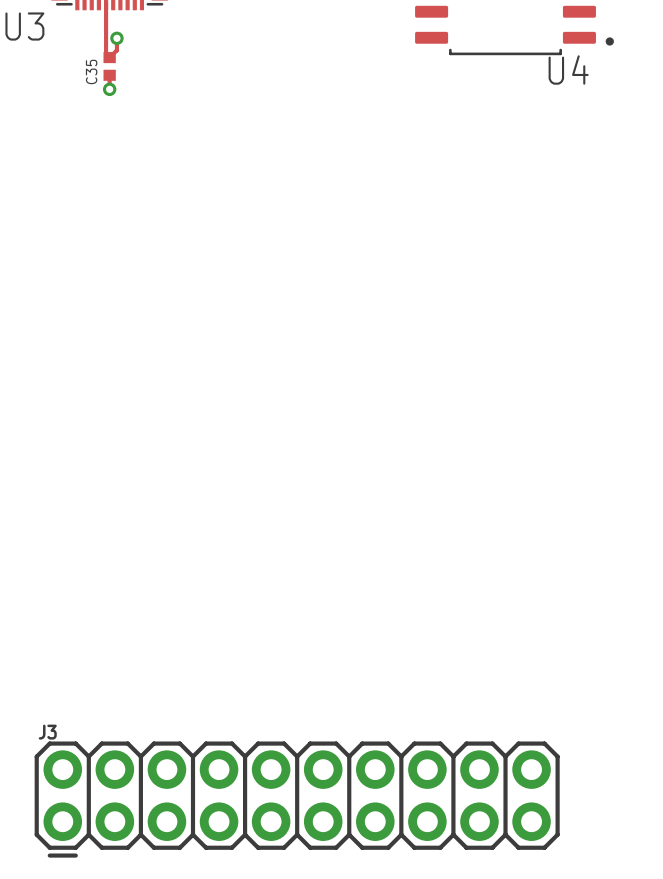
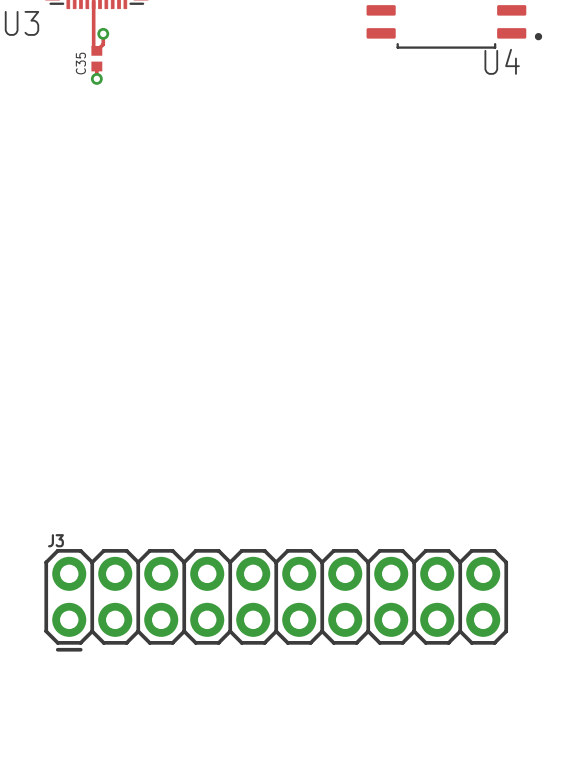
J3 position: (297, 799) -> (276, 600)

